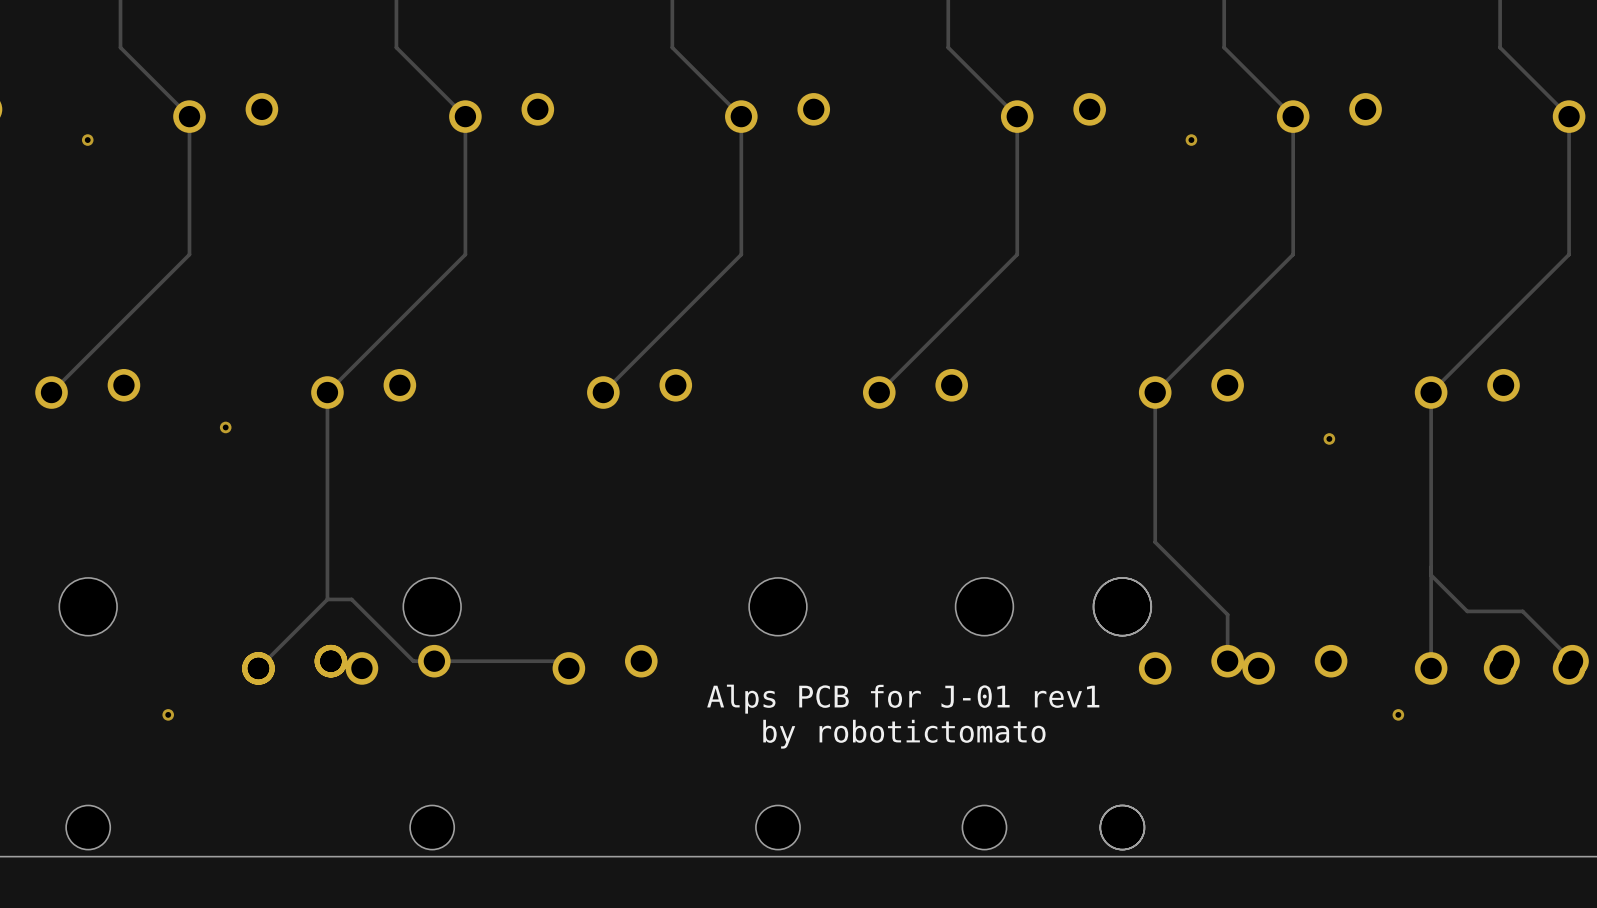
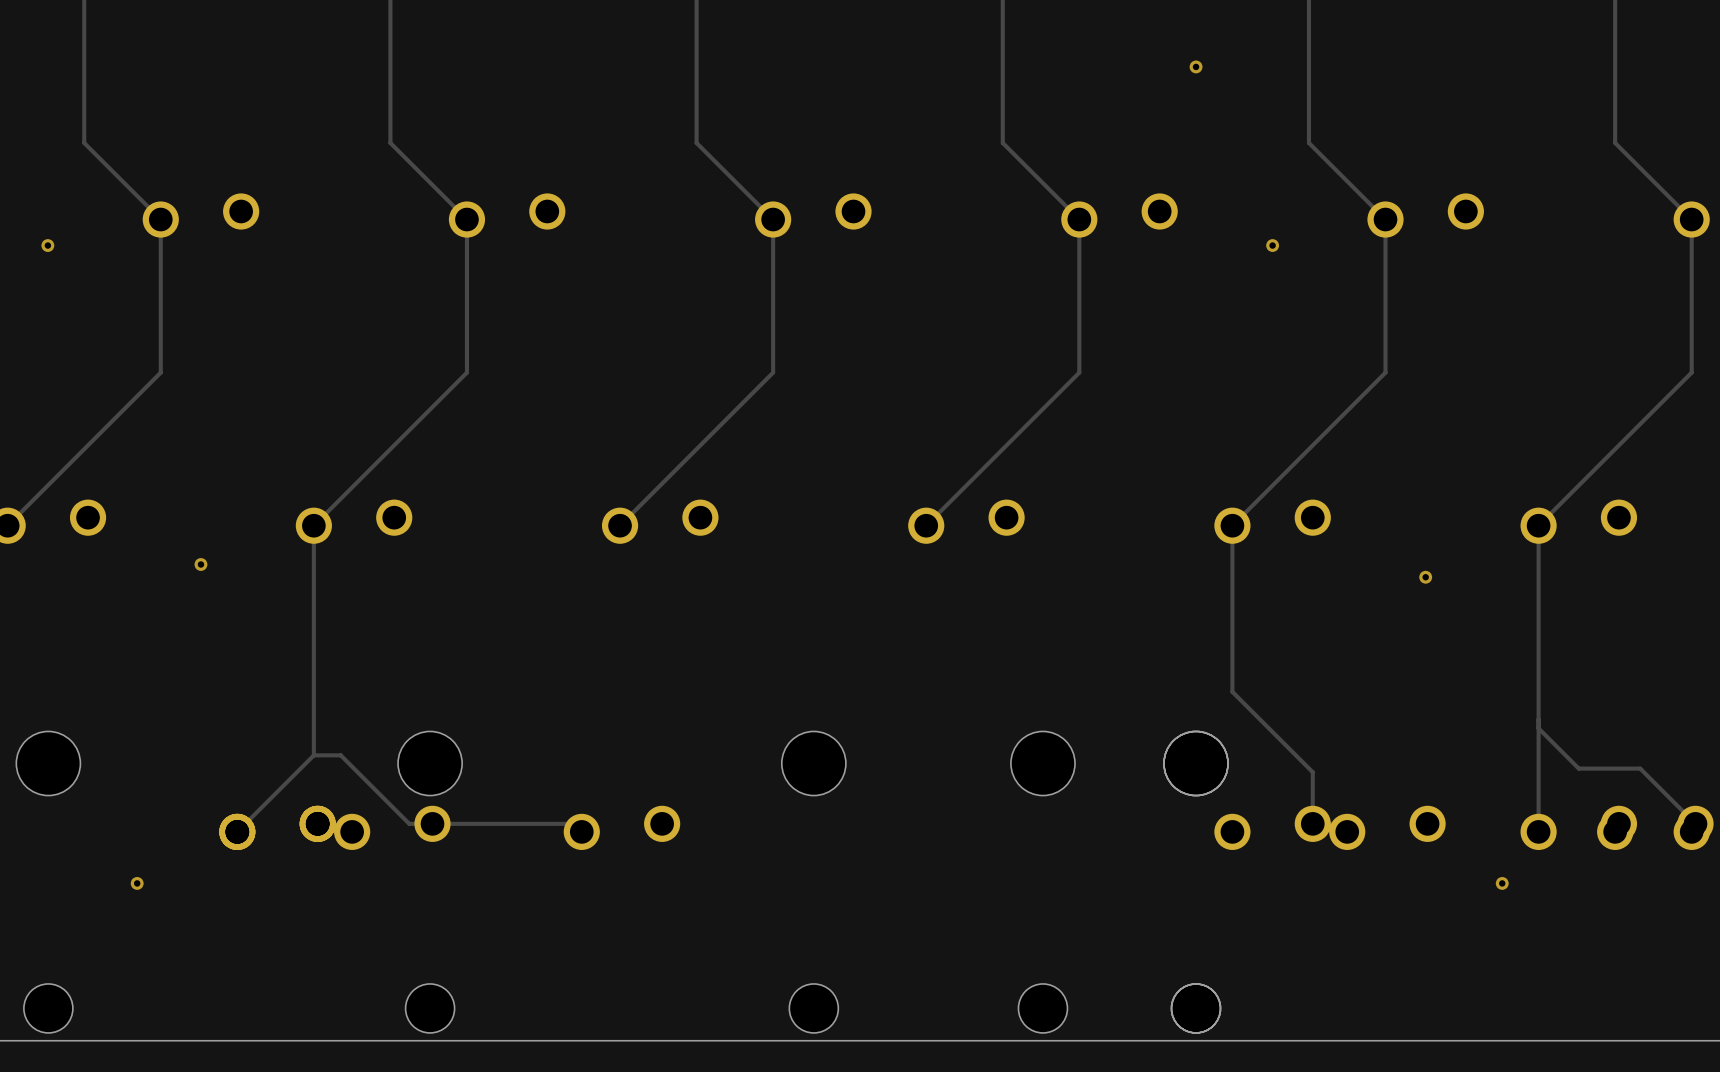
text: Alps PCB for J-01 rev1 (903, 699) -> none
text: by robotictomato (904, 734) -> none

